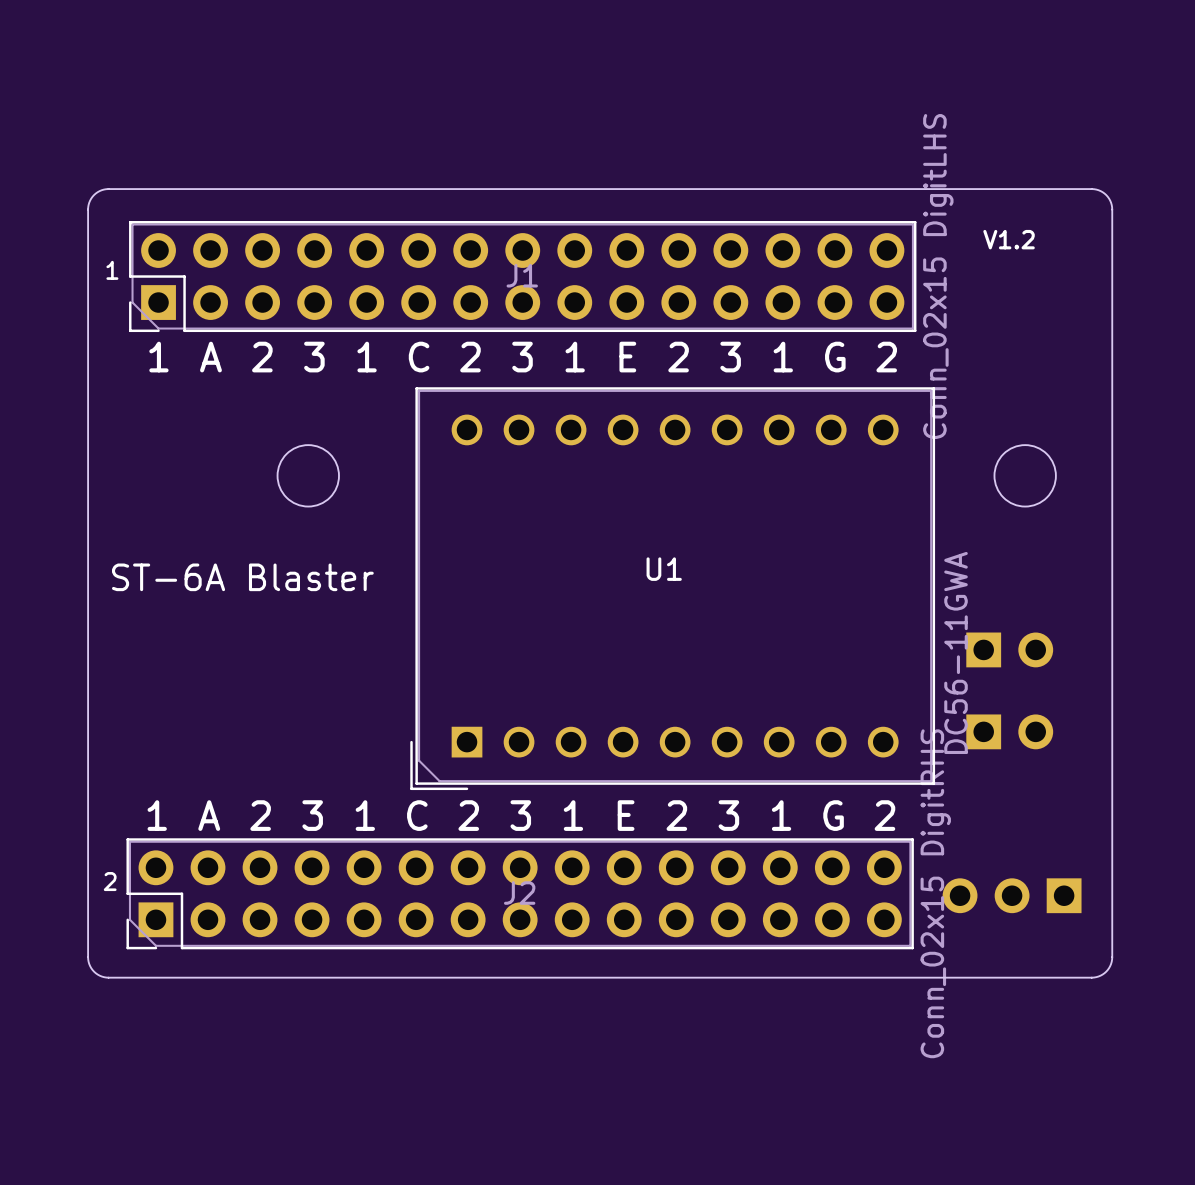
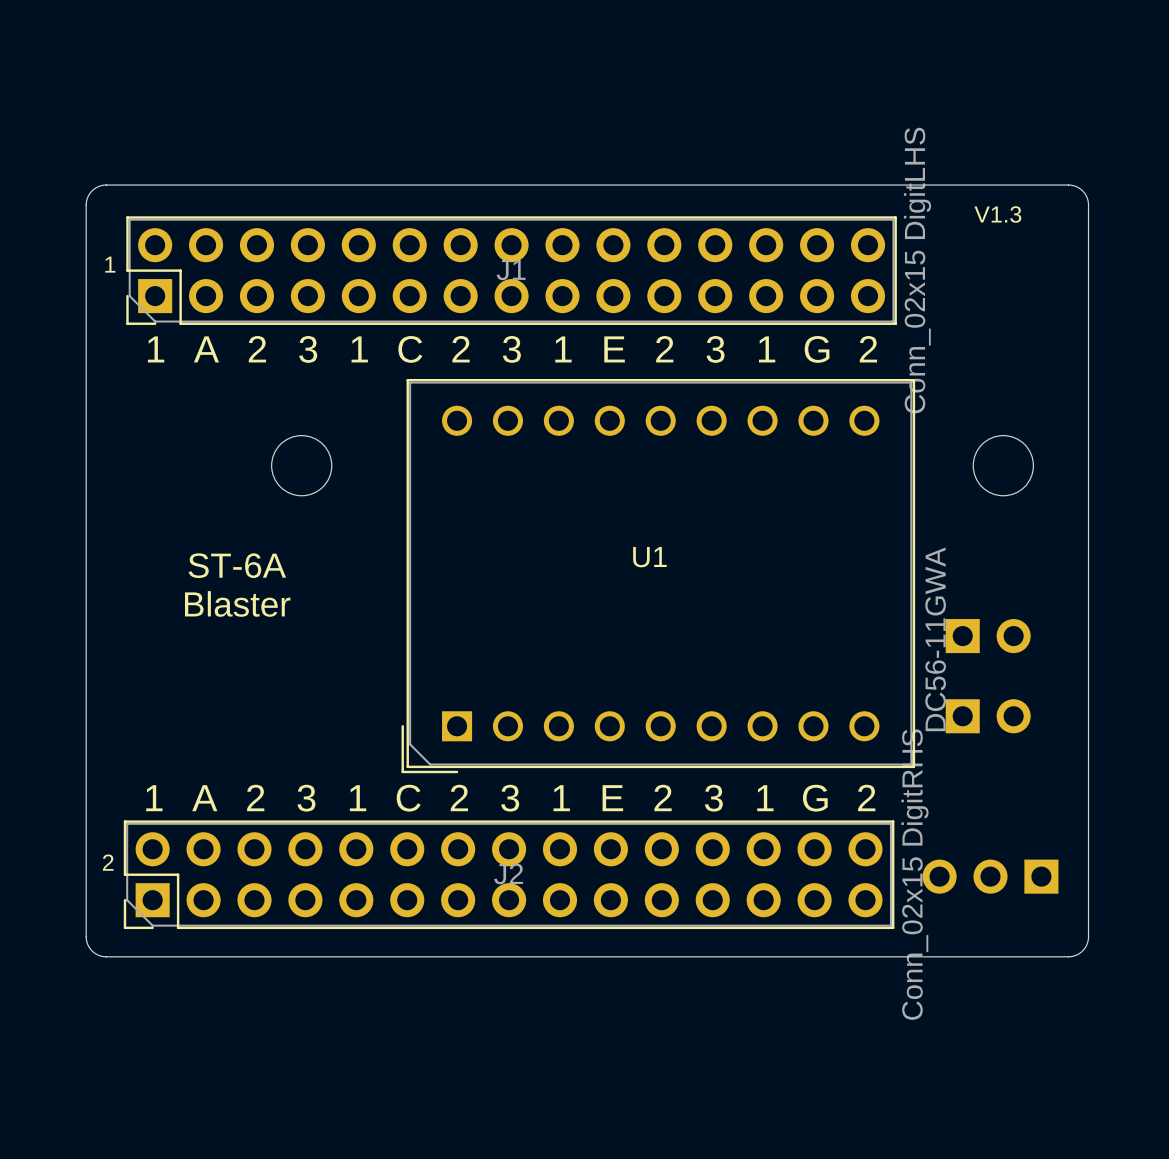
text: V1.2 (1009, 239) -> V1.3 (997, 214)
text: ST-6A Blaster (242, 577) -> ST-6A (237, 565)
text: none -> Blaster (237, 603)

